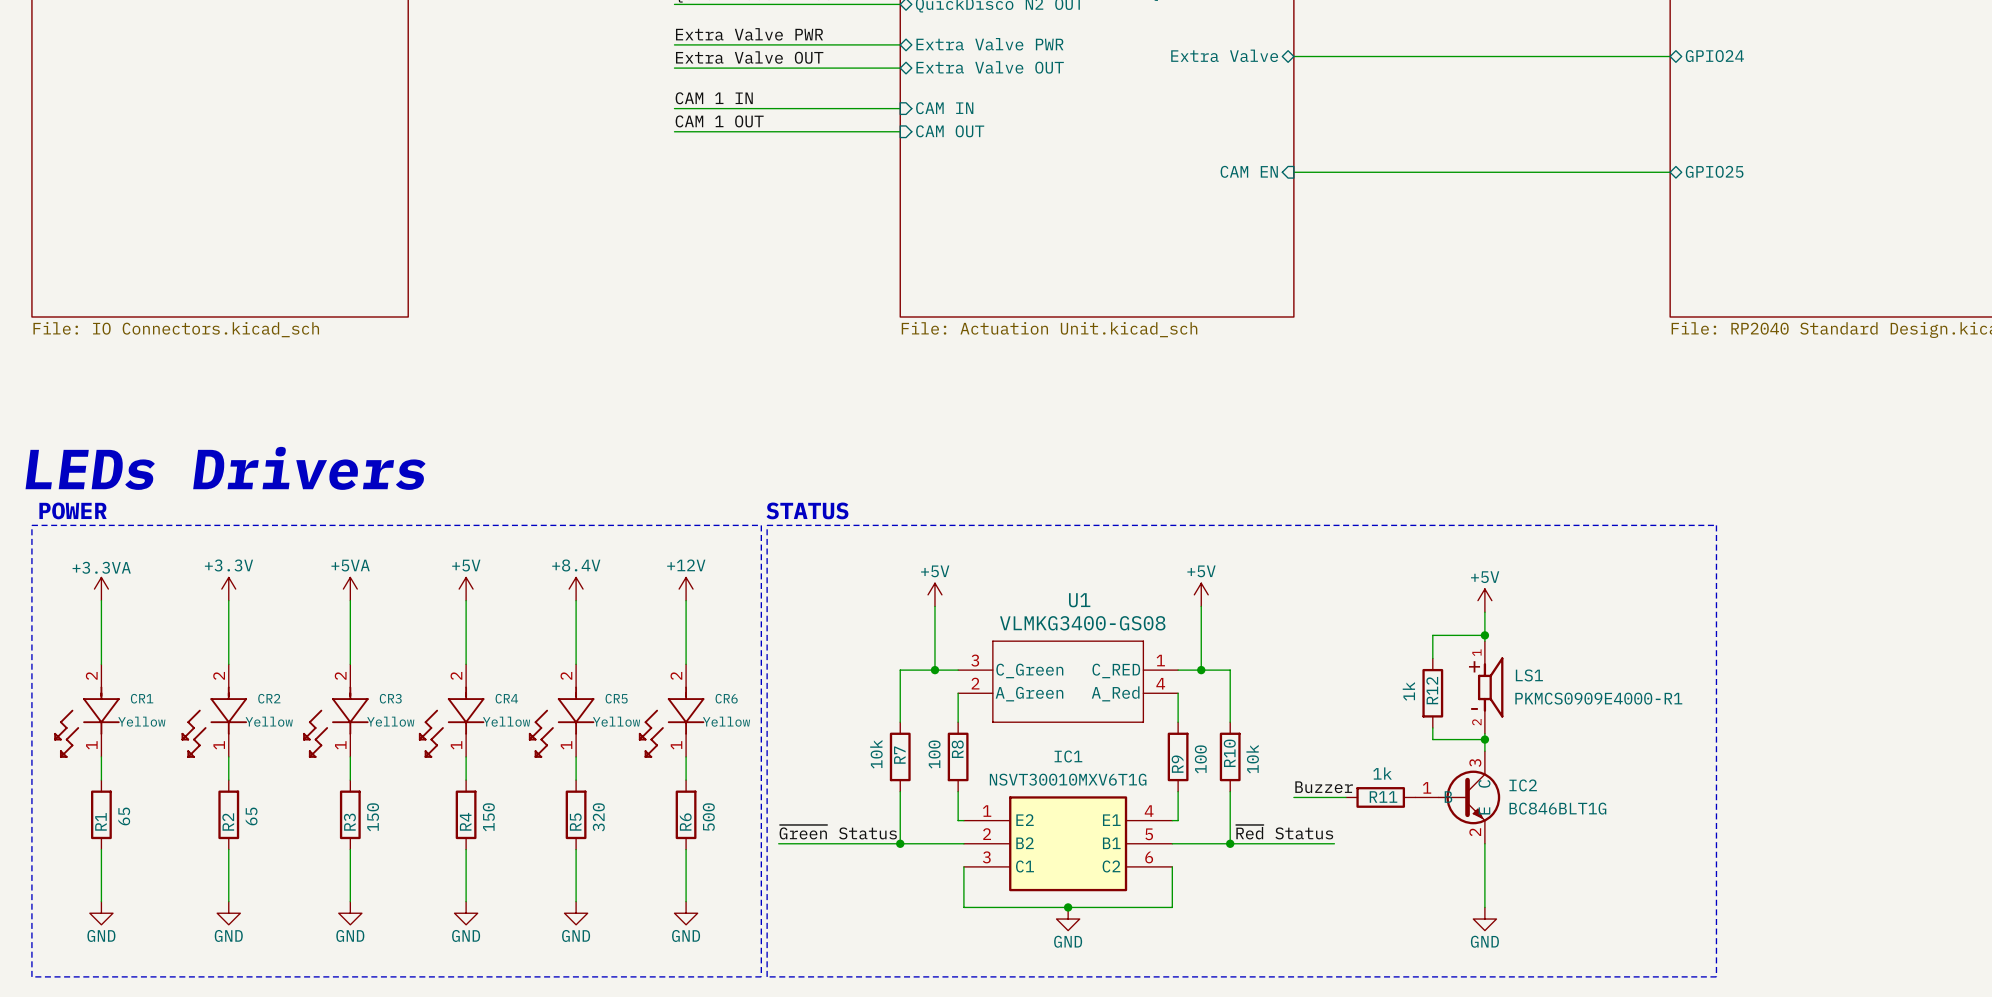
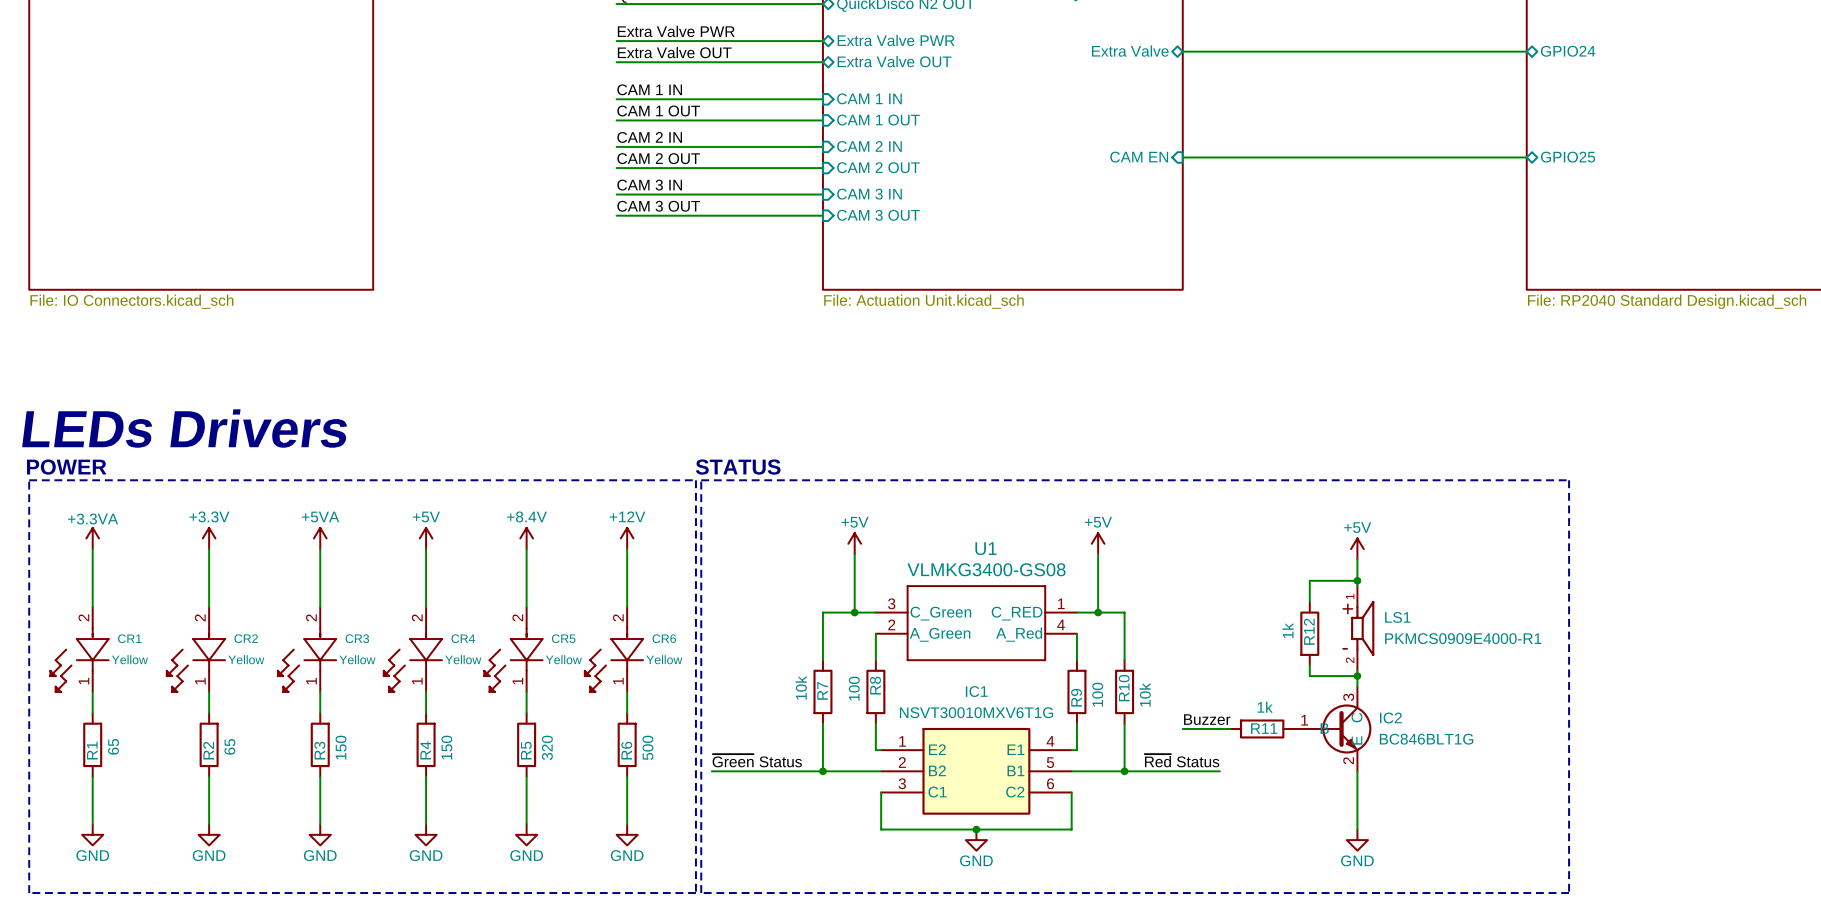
sheet pin: CAM IN (944, 108) -> CAM 1 IN (869, 98)
sheet pin: CAM OUT (950, 131) -> CAM 1 OUT (878, 120)
label: none -> CAM 2 IN (649, 137)
wire: none -> (616, 146) (822, 146)
sheet pin: none -> CAM 2 IN (869, 146)
label: none -> CAM 2 OUT (658, 158)
wire: none -> (616, 168) (822, 168)
sheet pin: none -> CAM 2 OUT (878, 167)
label: none -> CAM 3 IN (649, 185)
wire: none -> (616, 194) (822, 194)
sheet pin: none -> CAM 3 IN (869, 194)
label: none -> CAM 3 OUT (658, 206)
wire: none -> (616, 215) (822, 215)
sheet pin: none -> CAM 3 OUT (878, 215)

